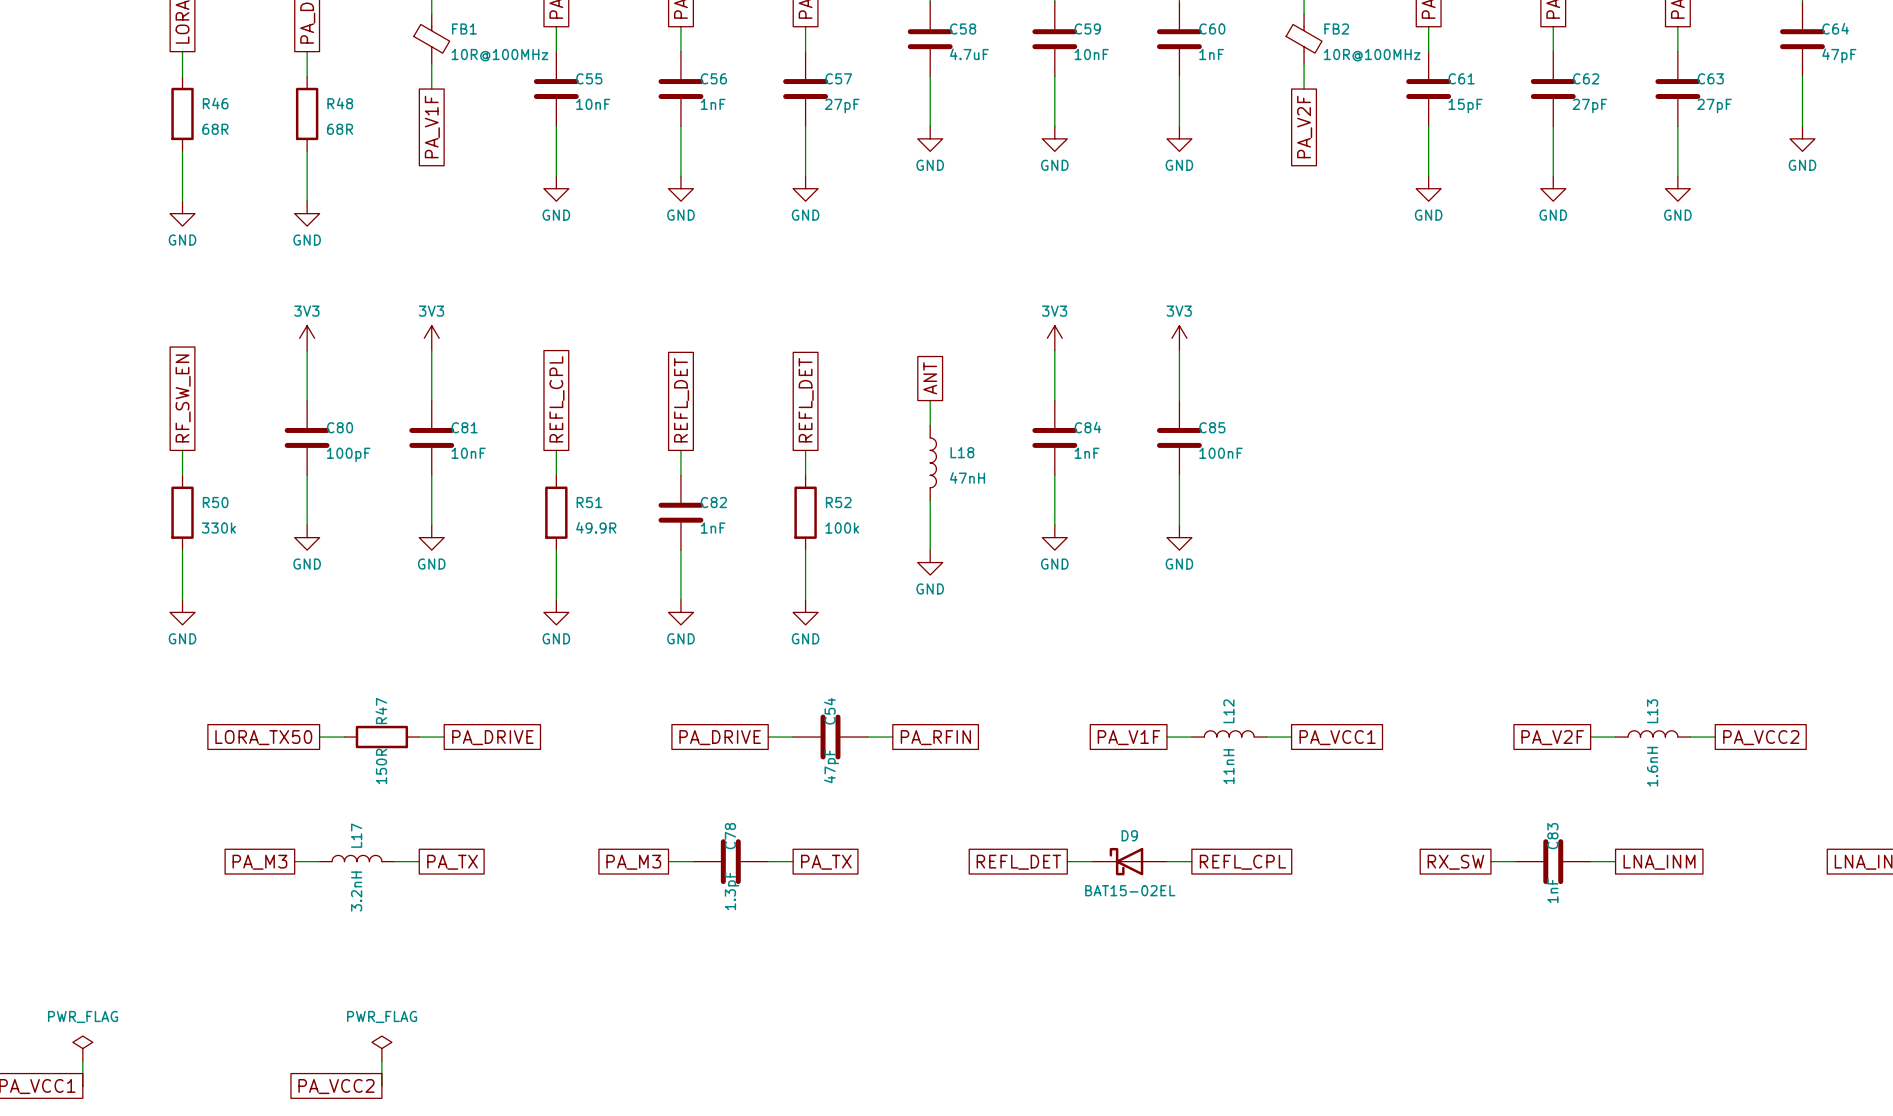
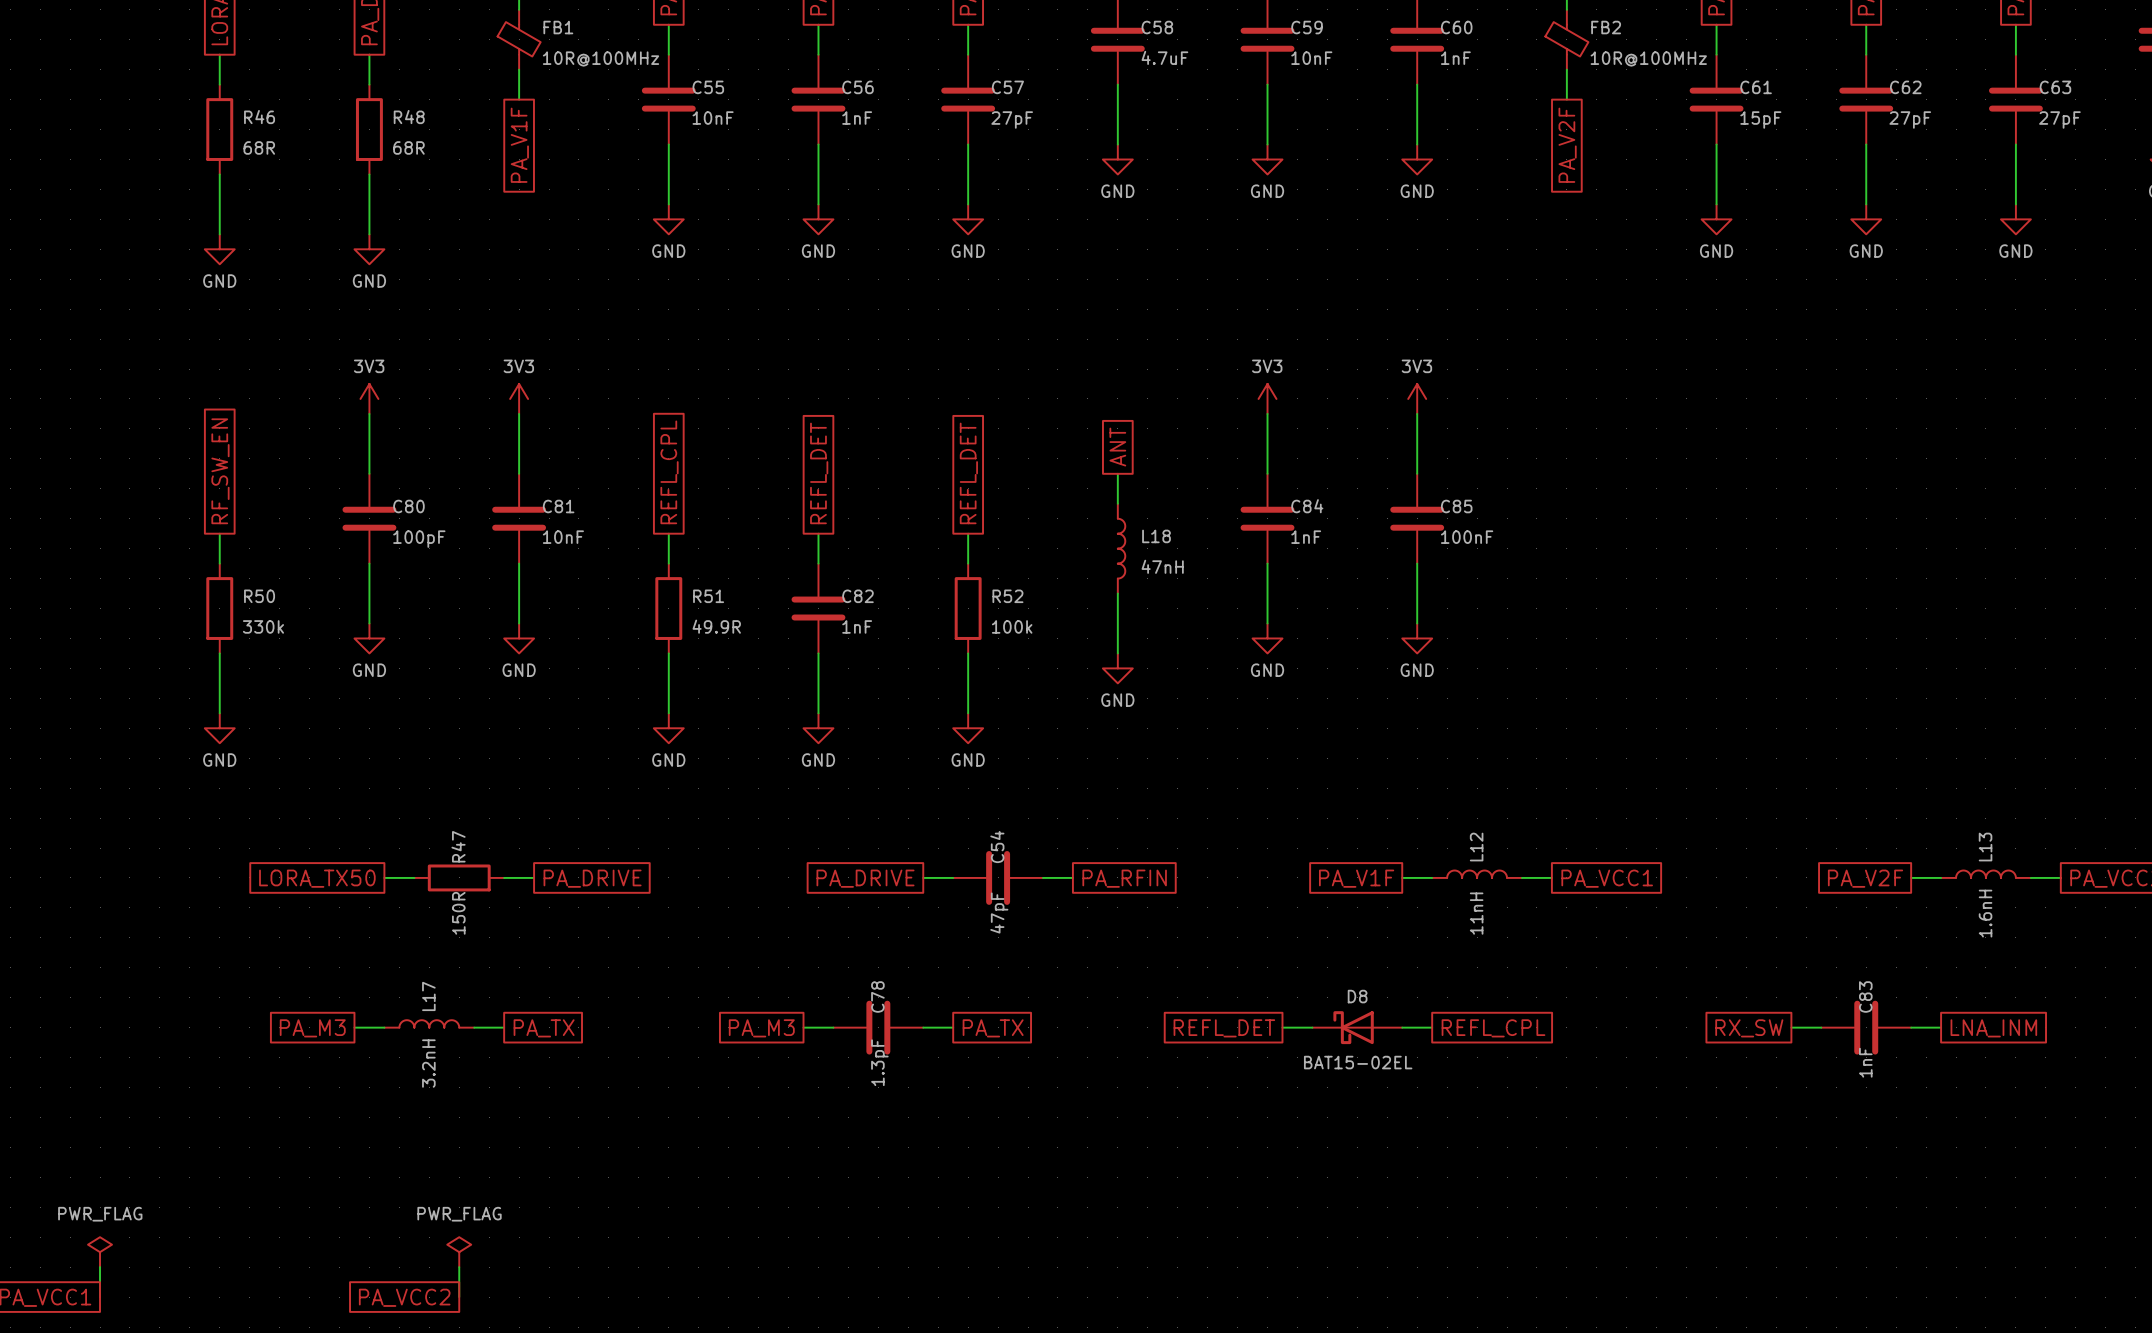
D9 name: D9 (1129, 835) -> D8 (1357, 996)

